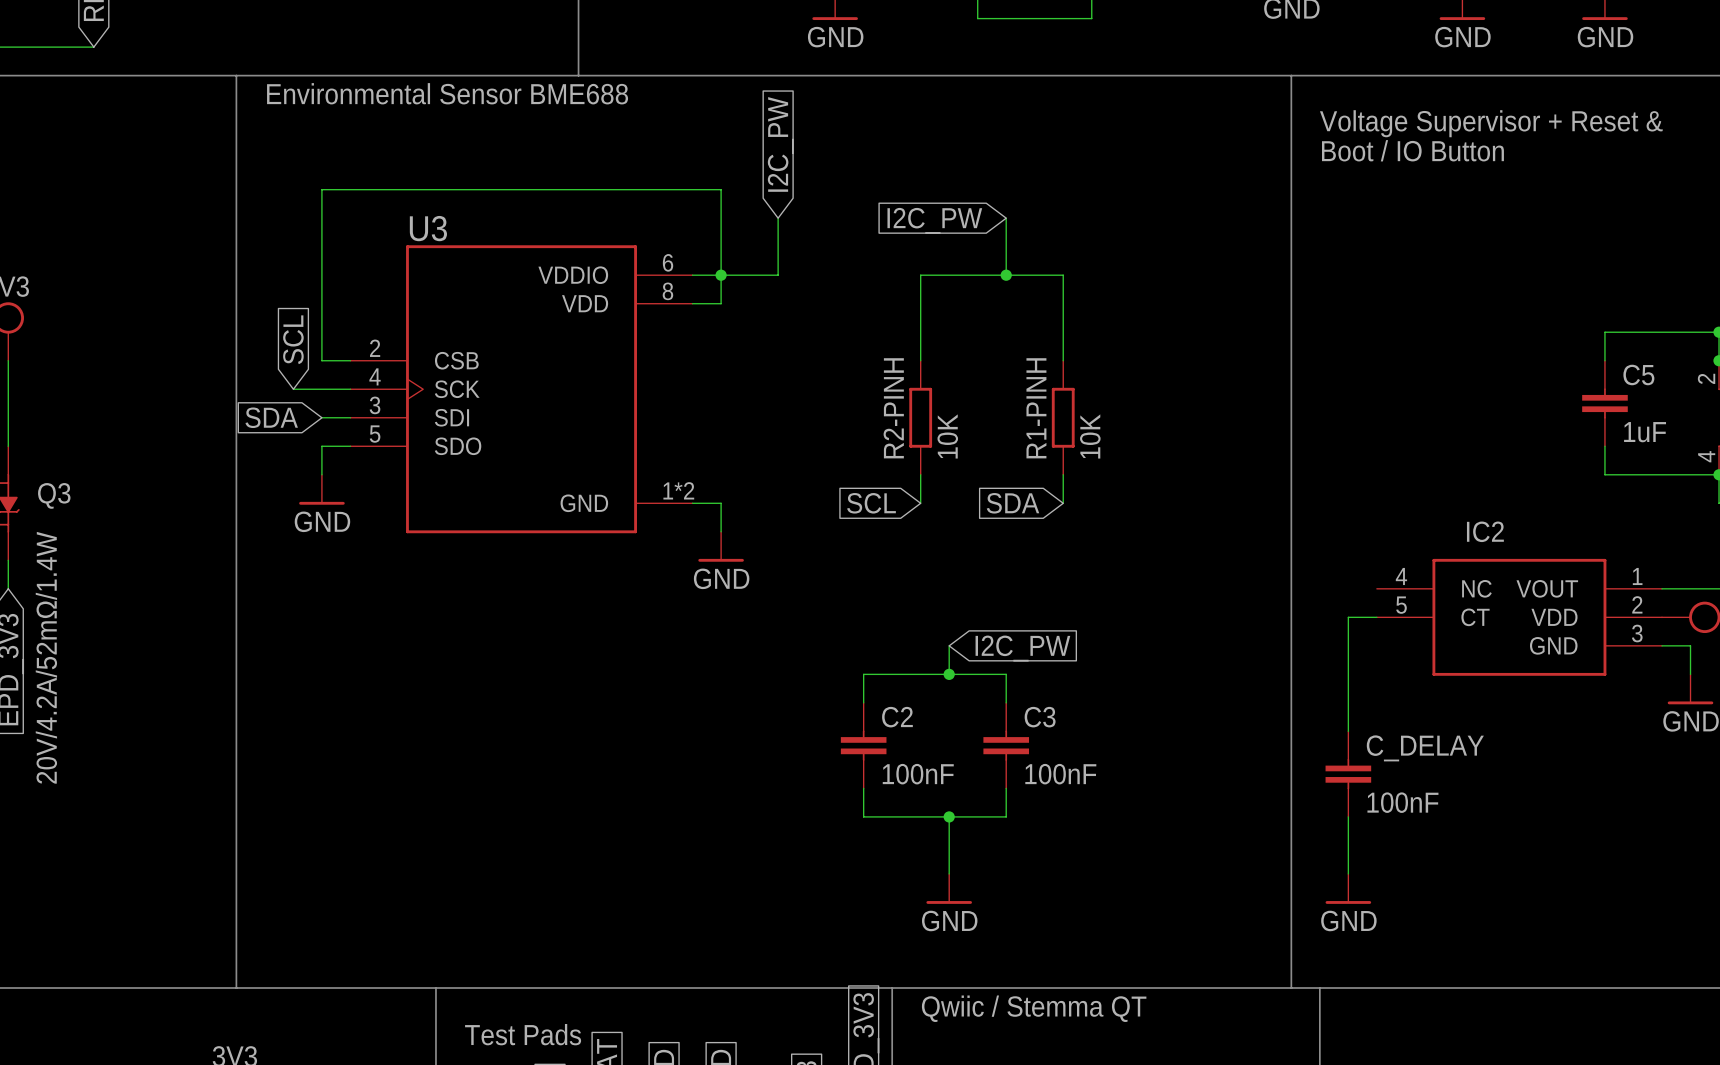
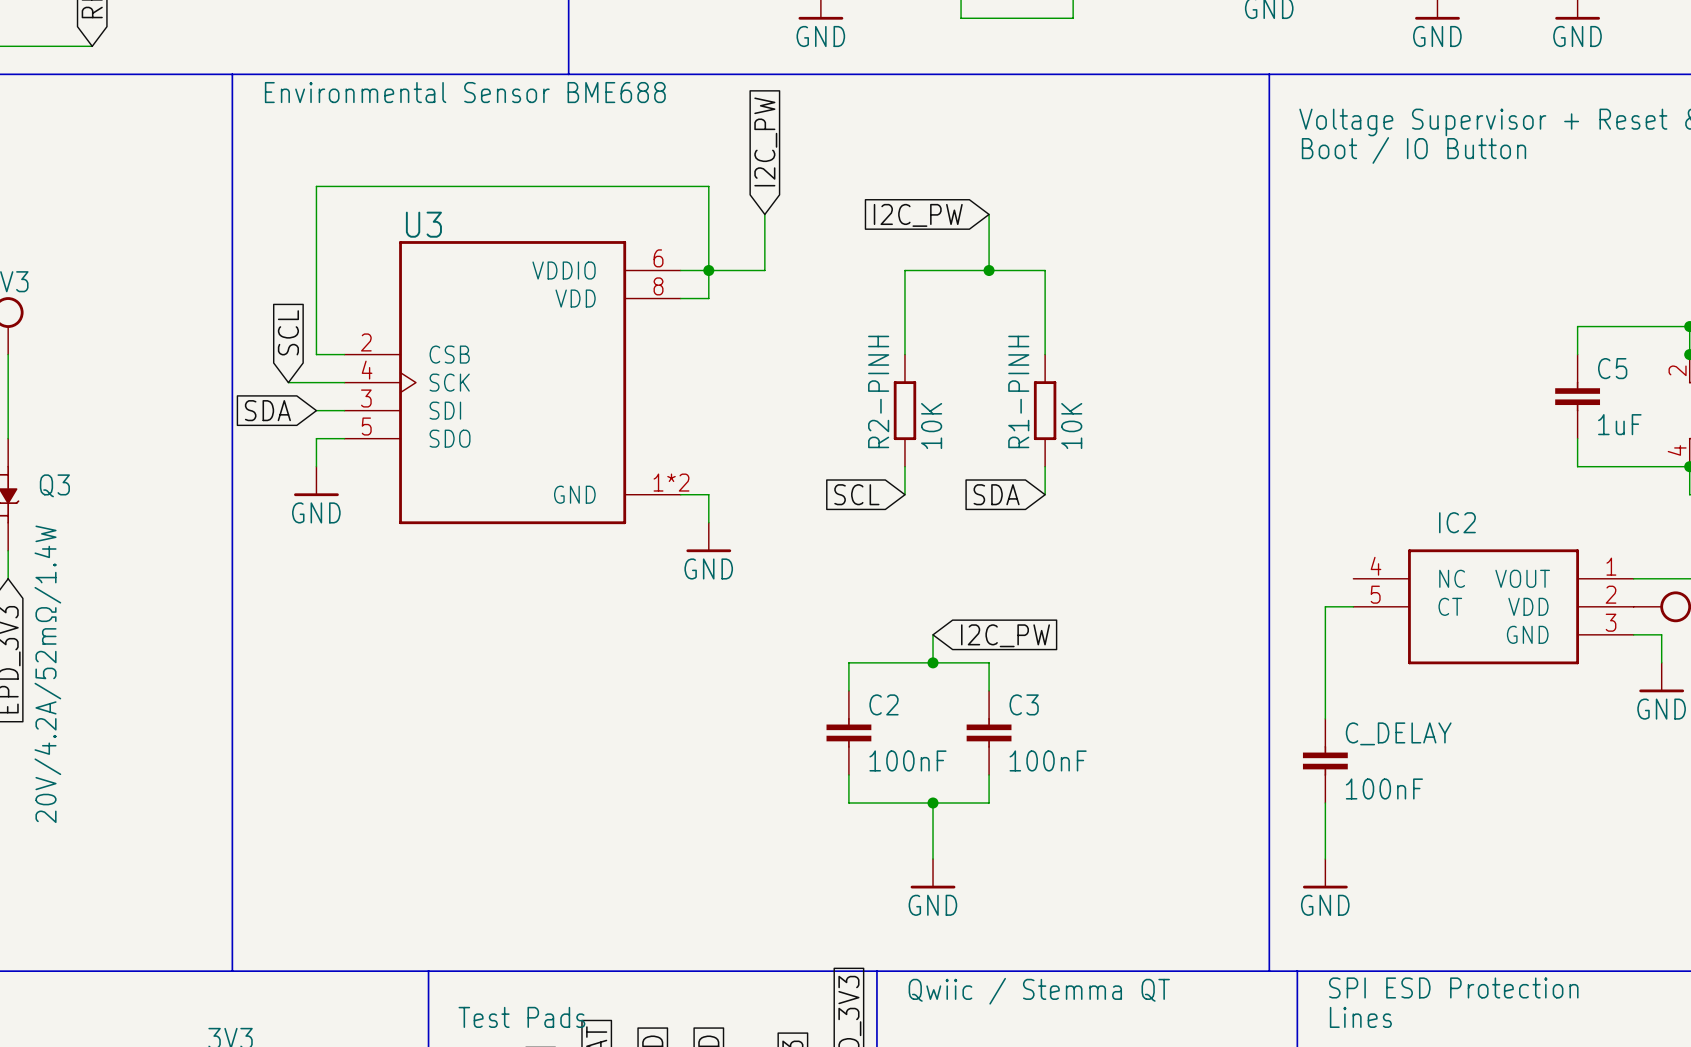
text: none -> SPI ESD Protection (1453, 987)
text: none -> Lines (1360, 1017)

